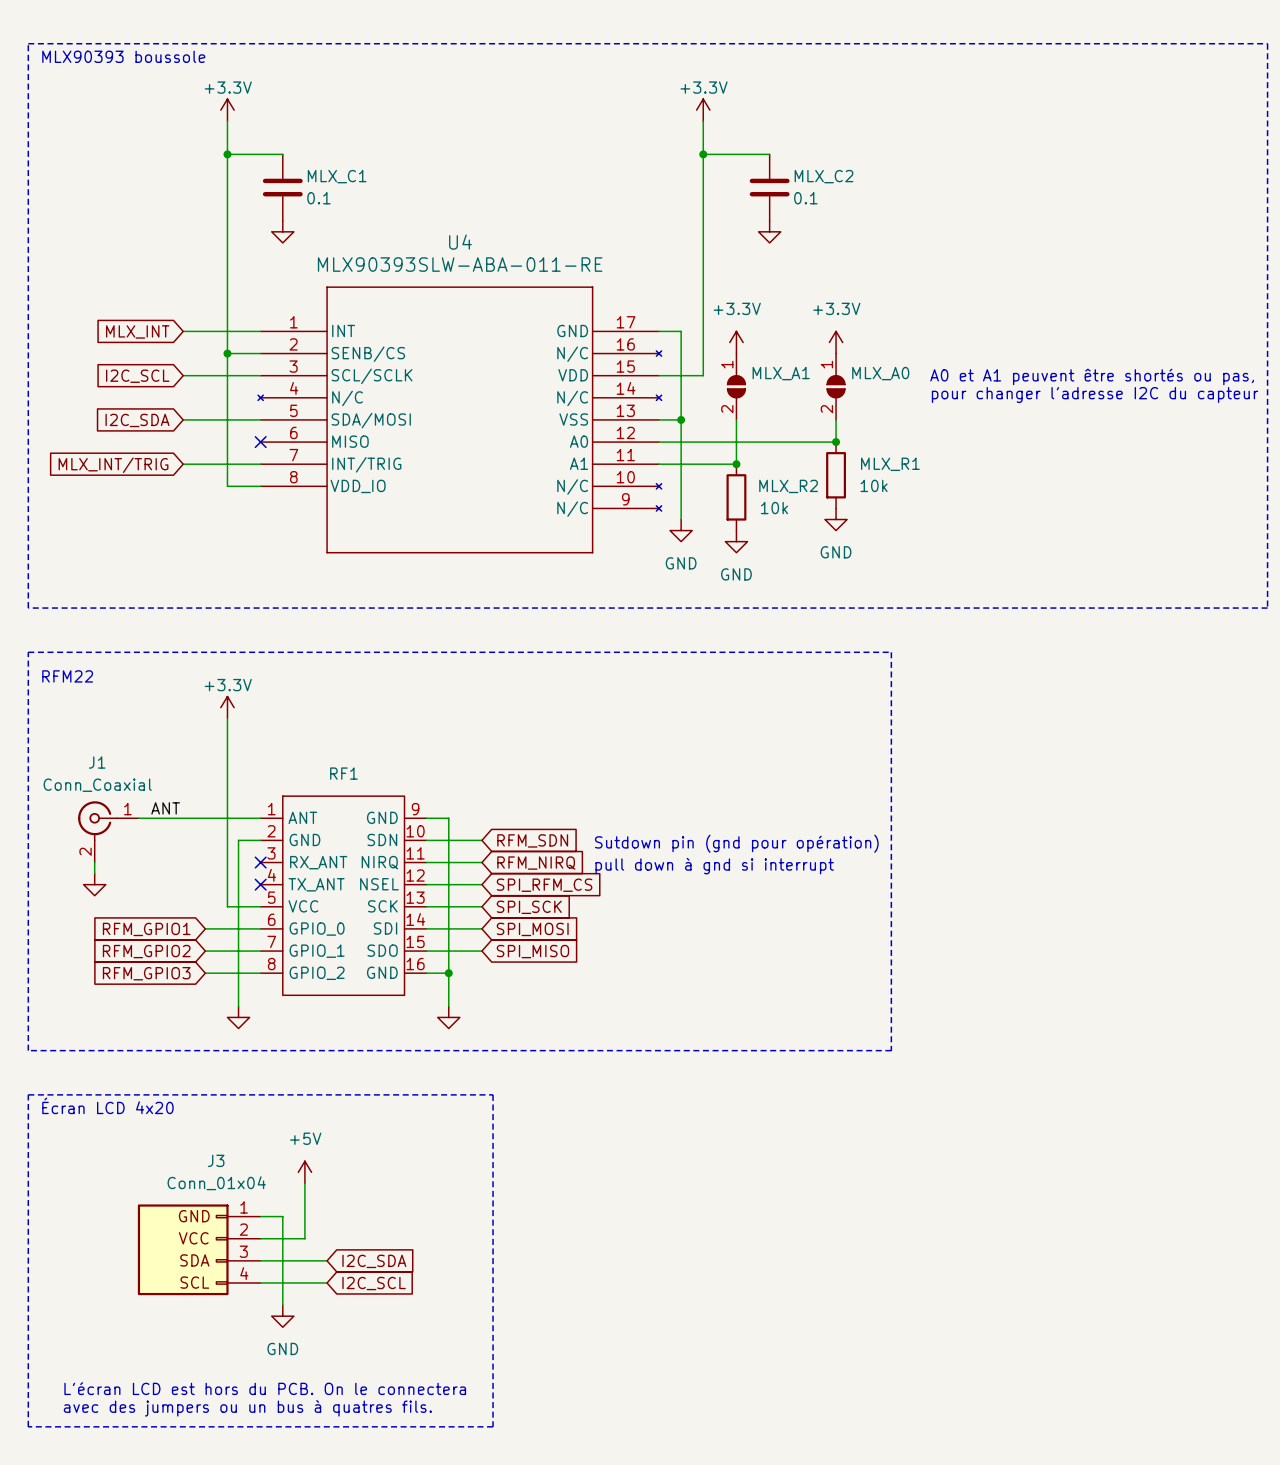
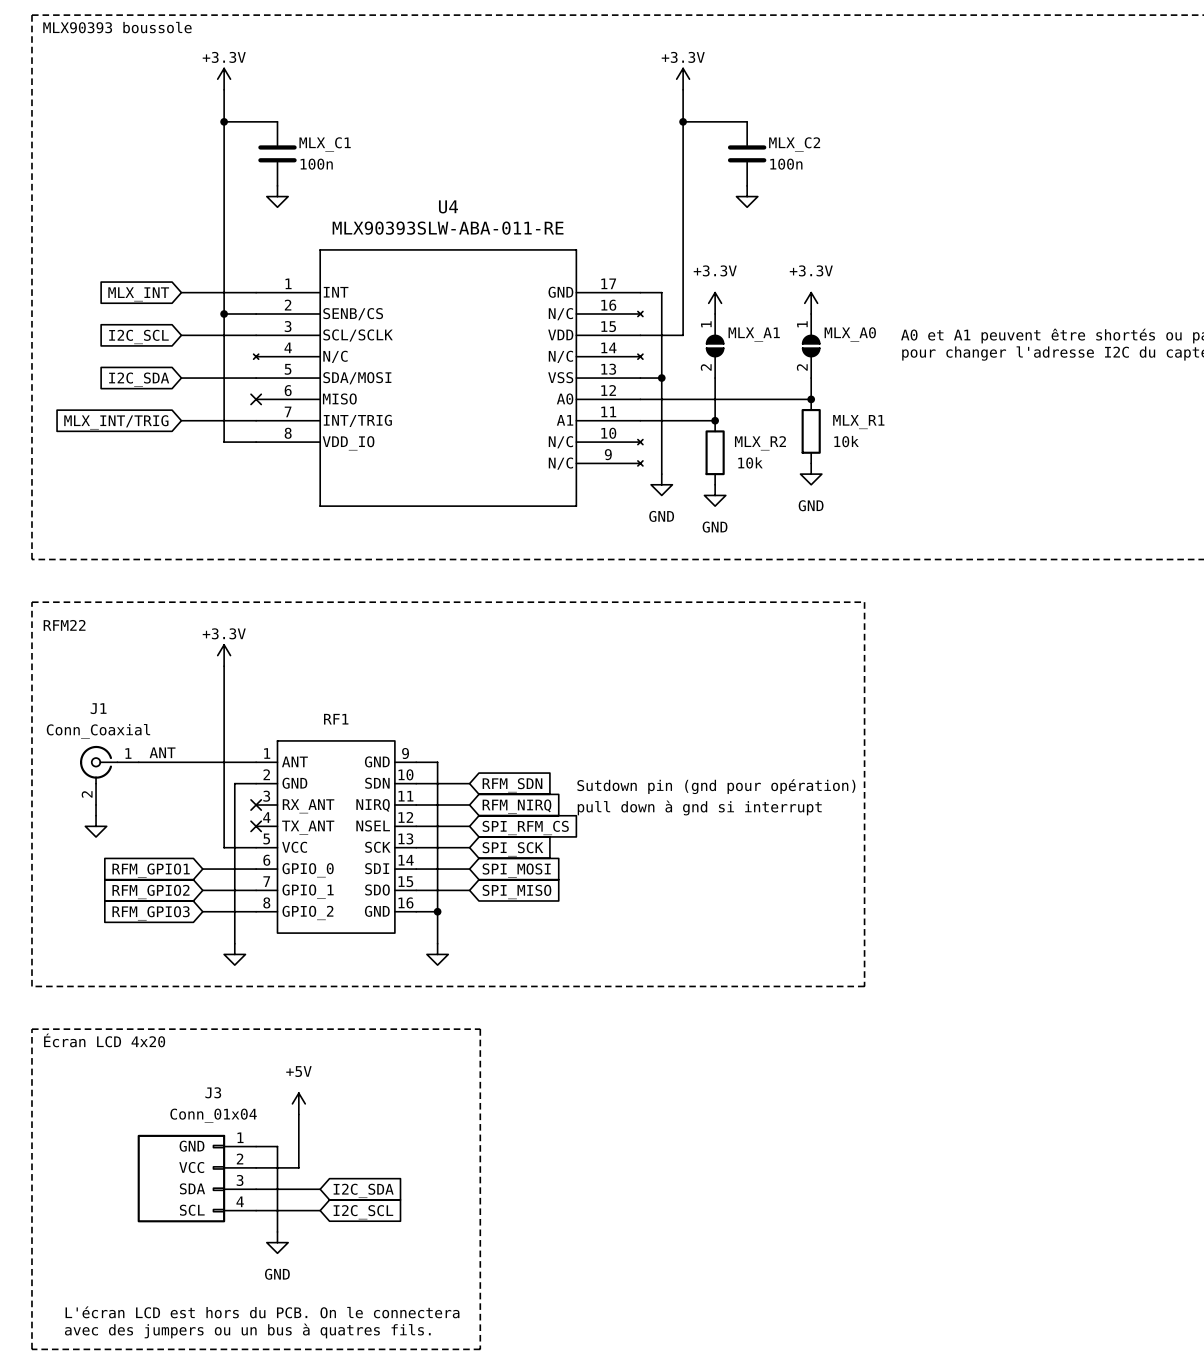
MLX_C1 value: 0.1 (318, 198) -> 100n (316, 164)
MLX_C2 value: 0.1 (805, 198) -> 100n (786, 164)

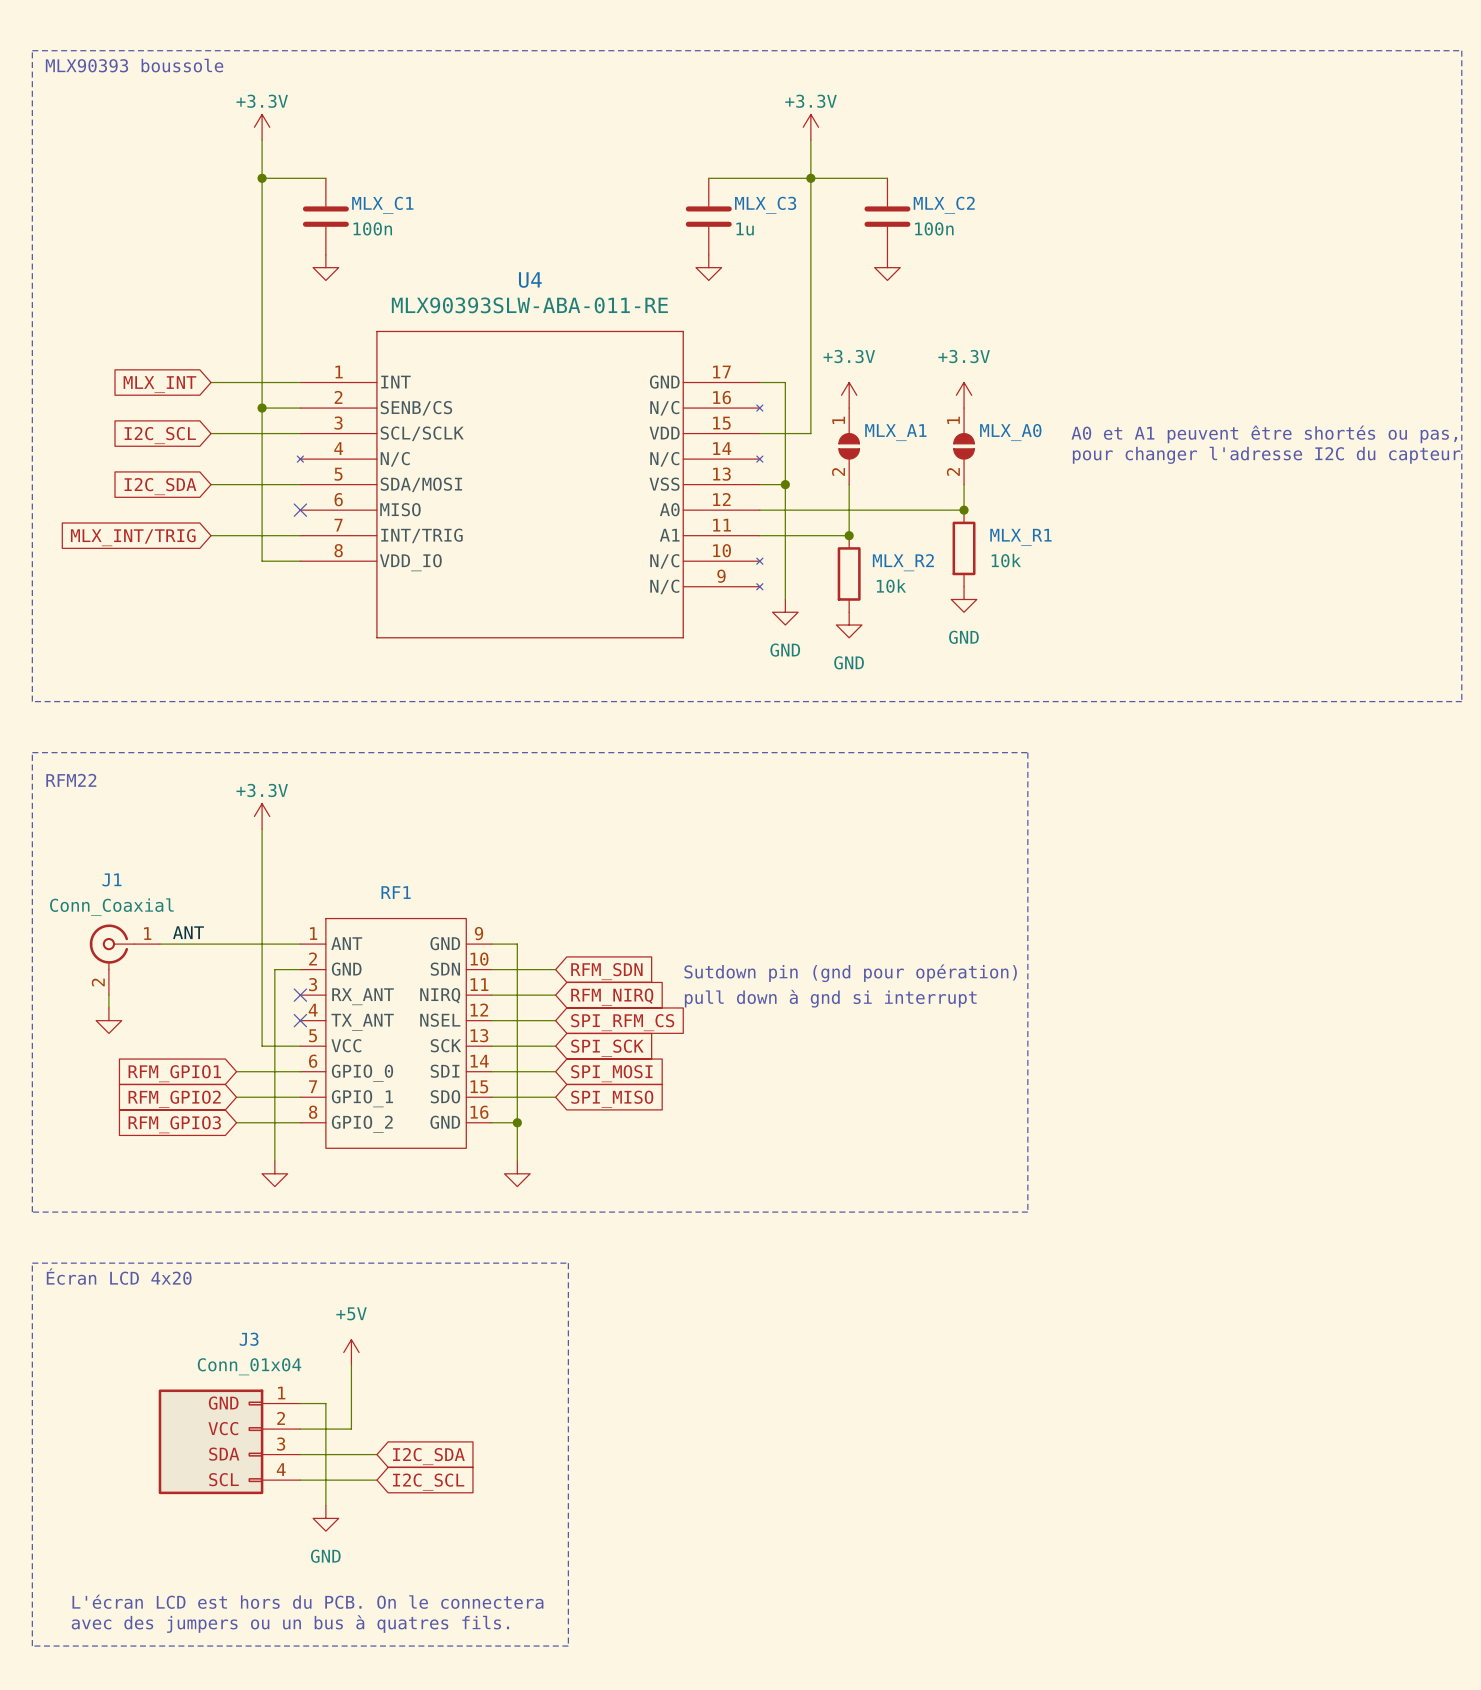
wire: none -> (708, 178) (810, 178)
MLX_C3: none -> 1u (708, 216)
power symbol: none -> (708, 267)

